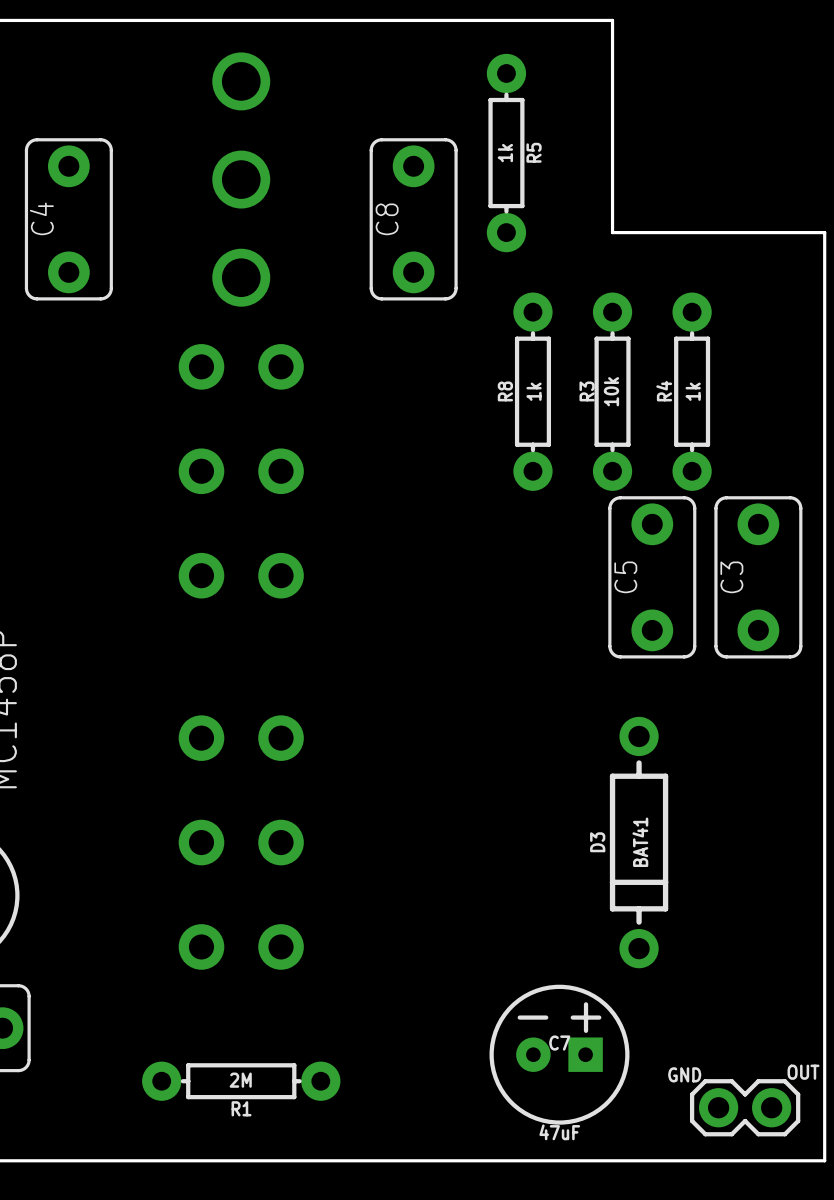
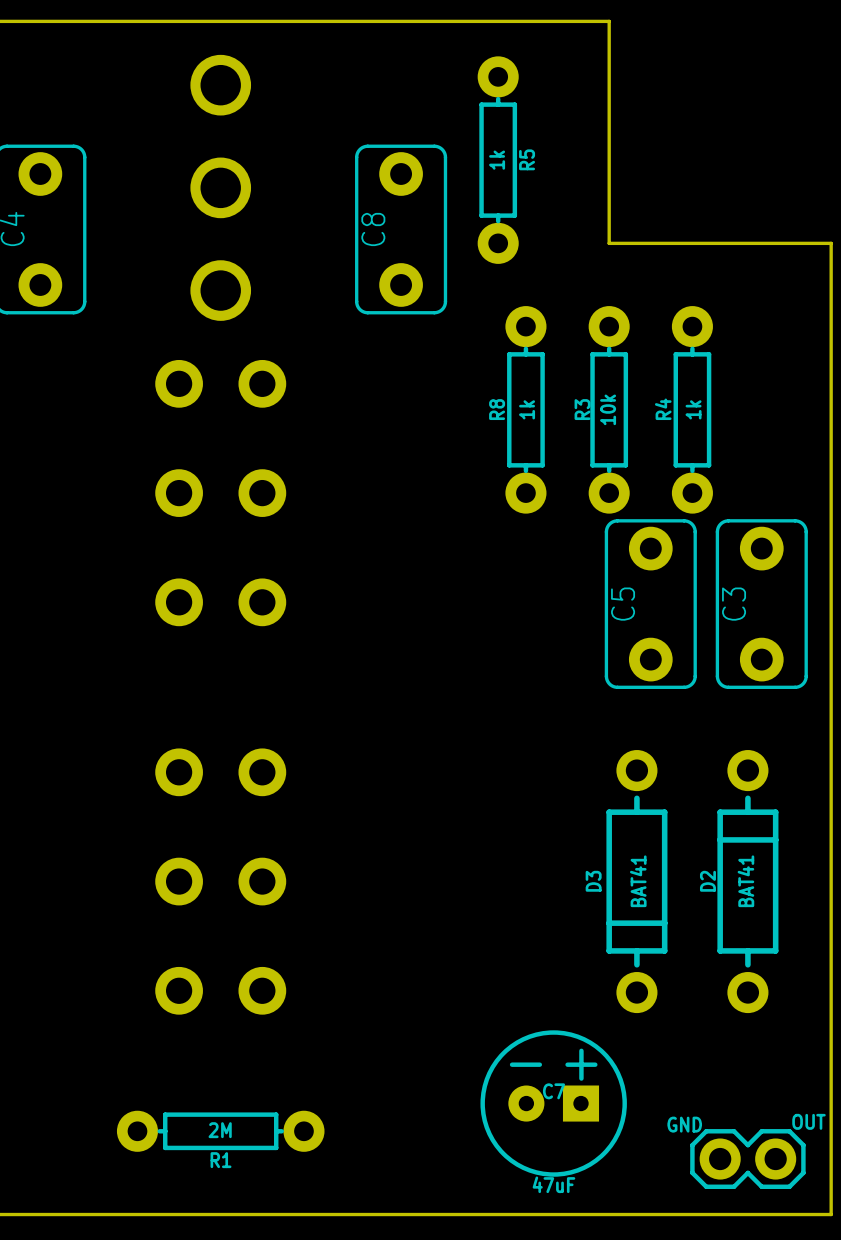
D2: none -> BAT41 (747, 881)

